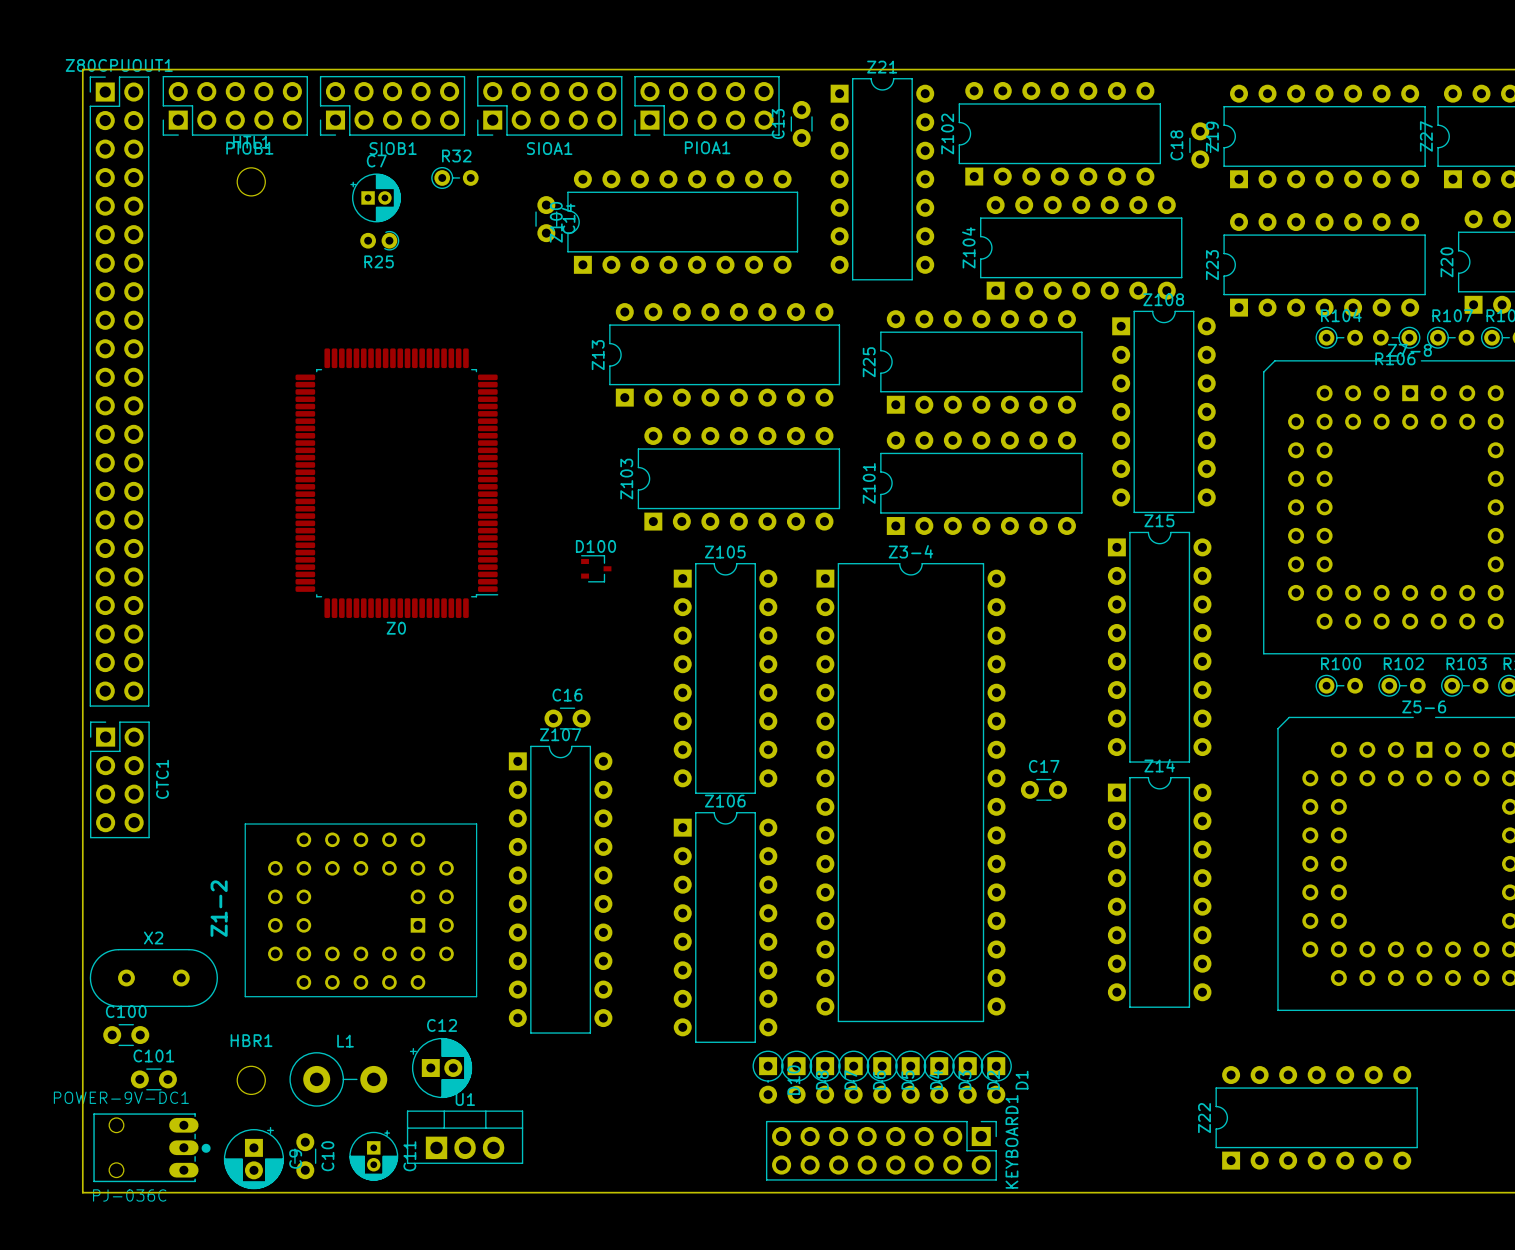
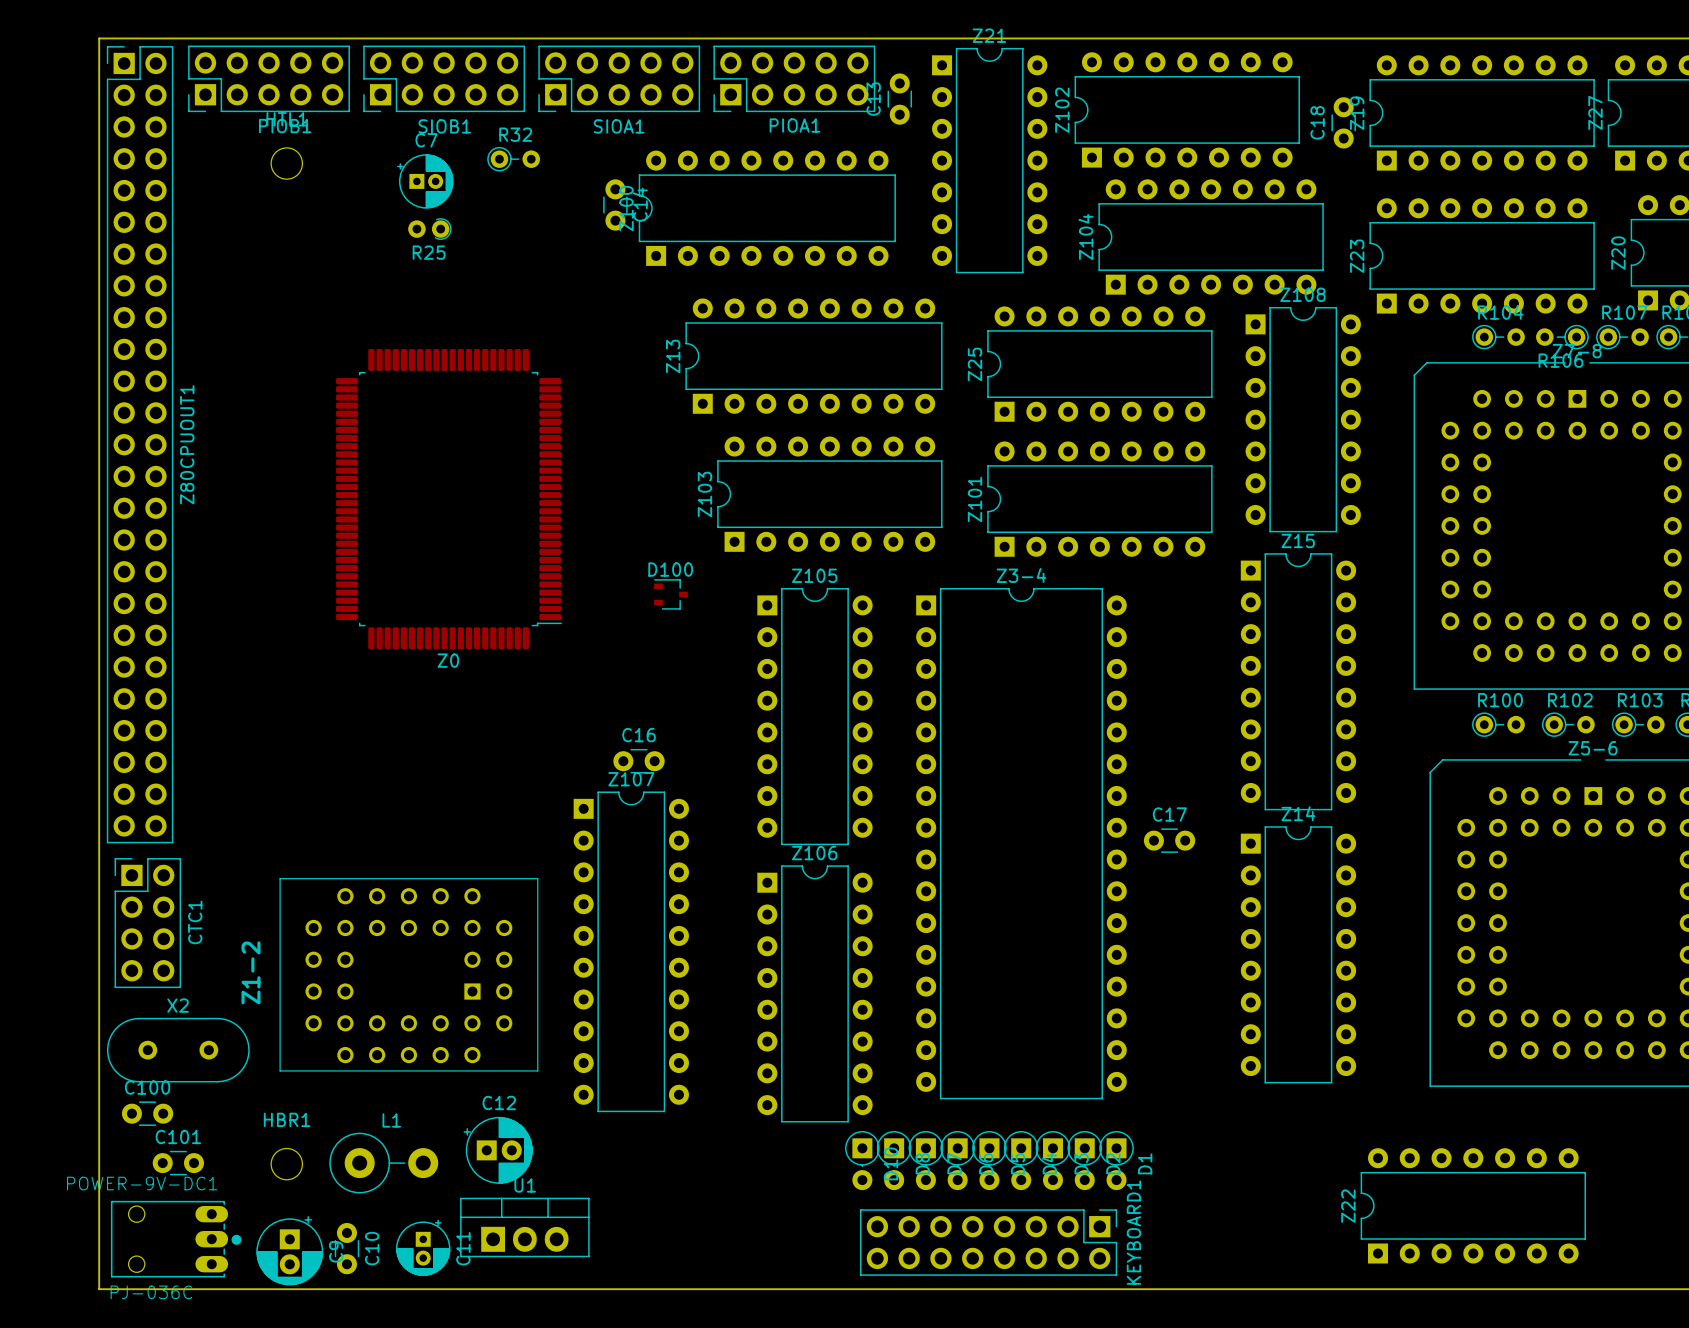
Z80CPUOUT1 name position: Z80CPUOUT1 (119, 65) -> Z80CPUOUT1 (187, 444)
Z80CPUOUT1 footprint: [89, 76, 150, 707] -> [106, 46, 174, 844]
CTC1 position: (119, 779) -> (147, 923)

